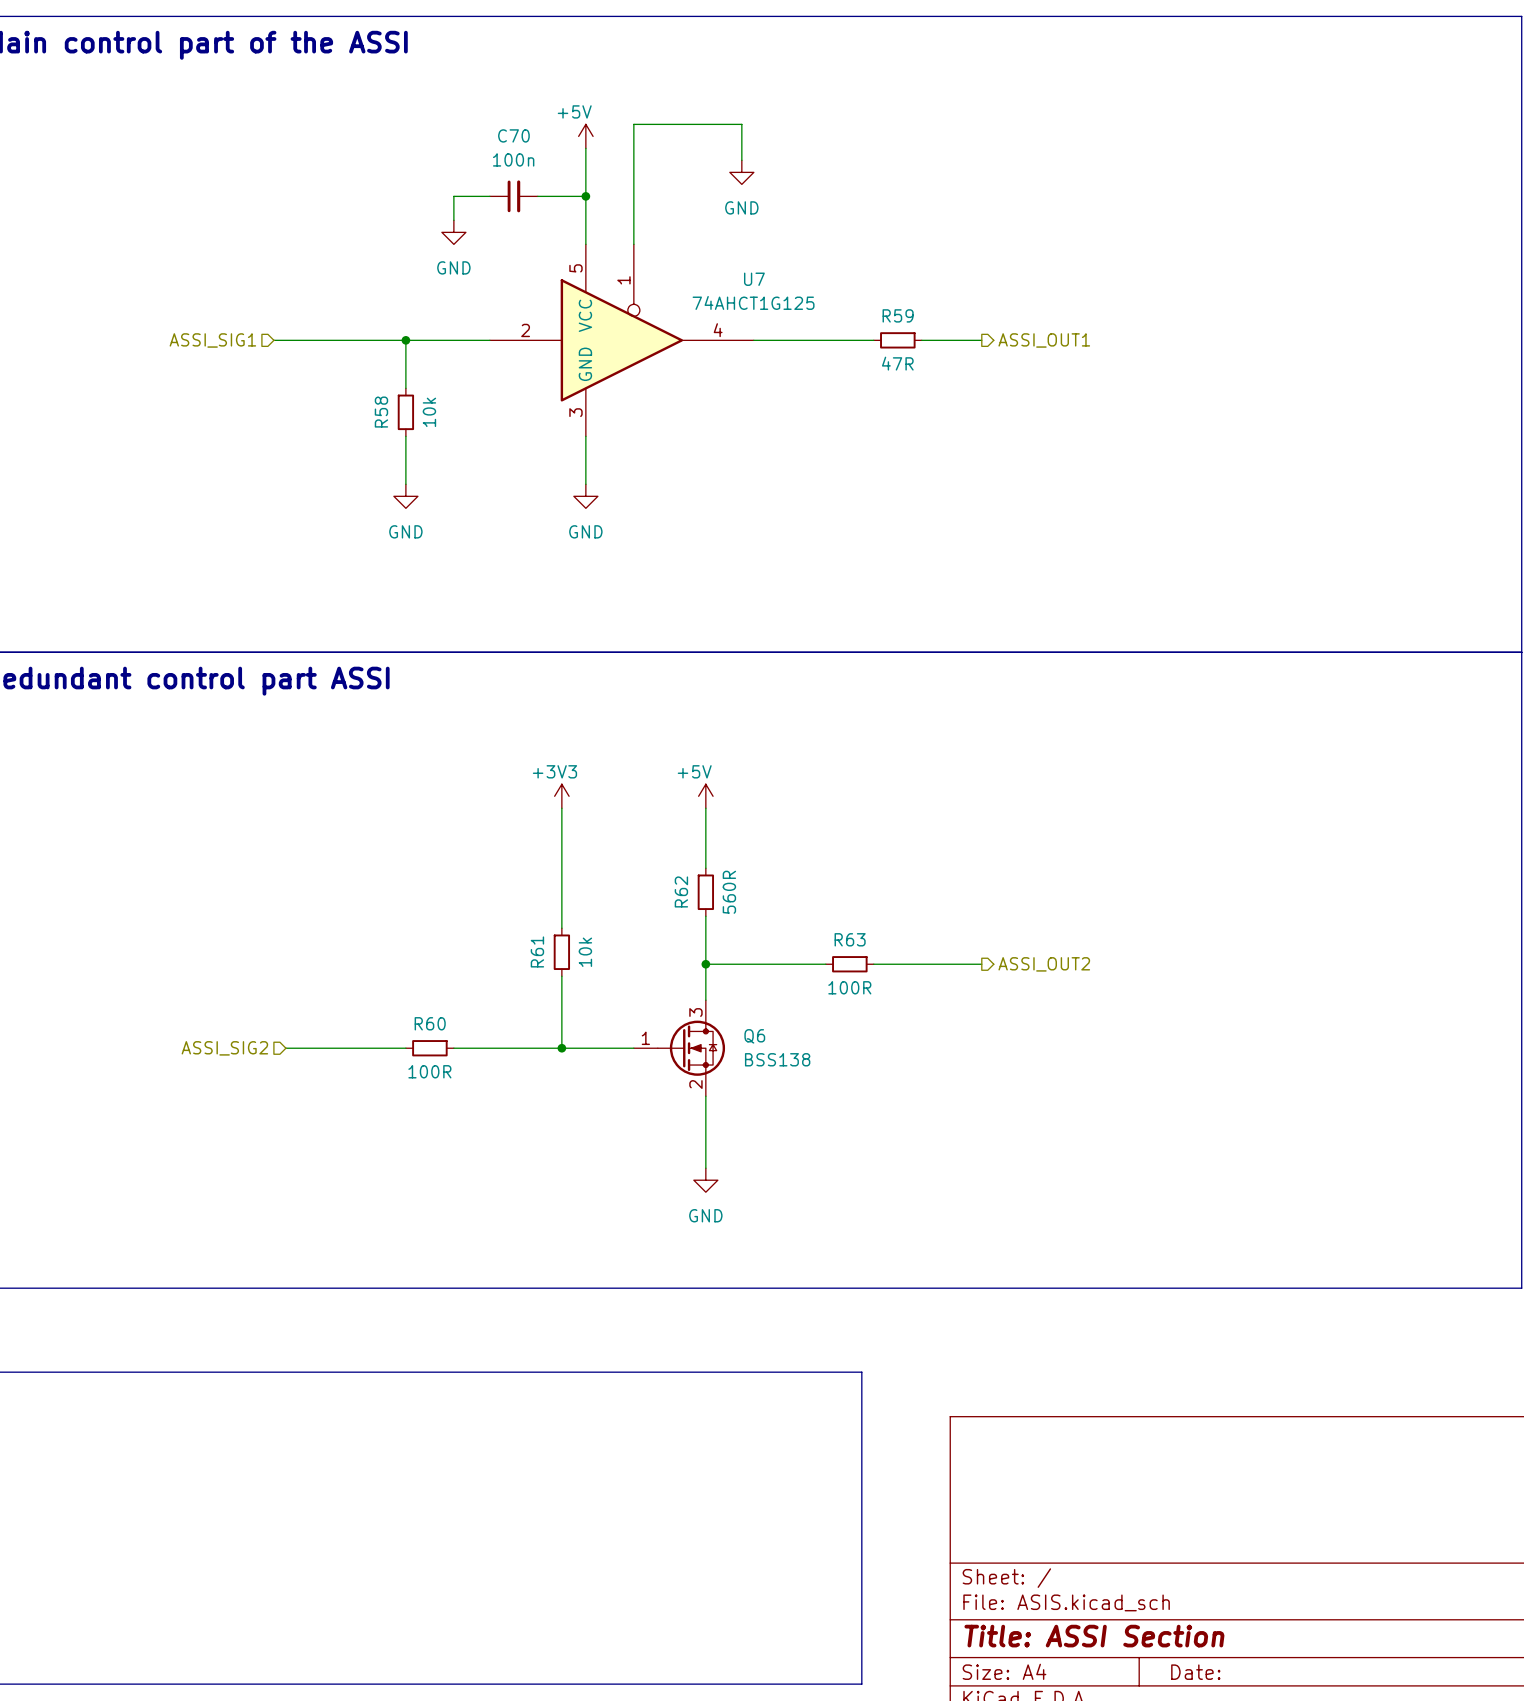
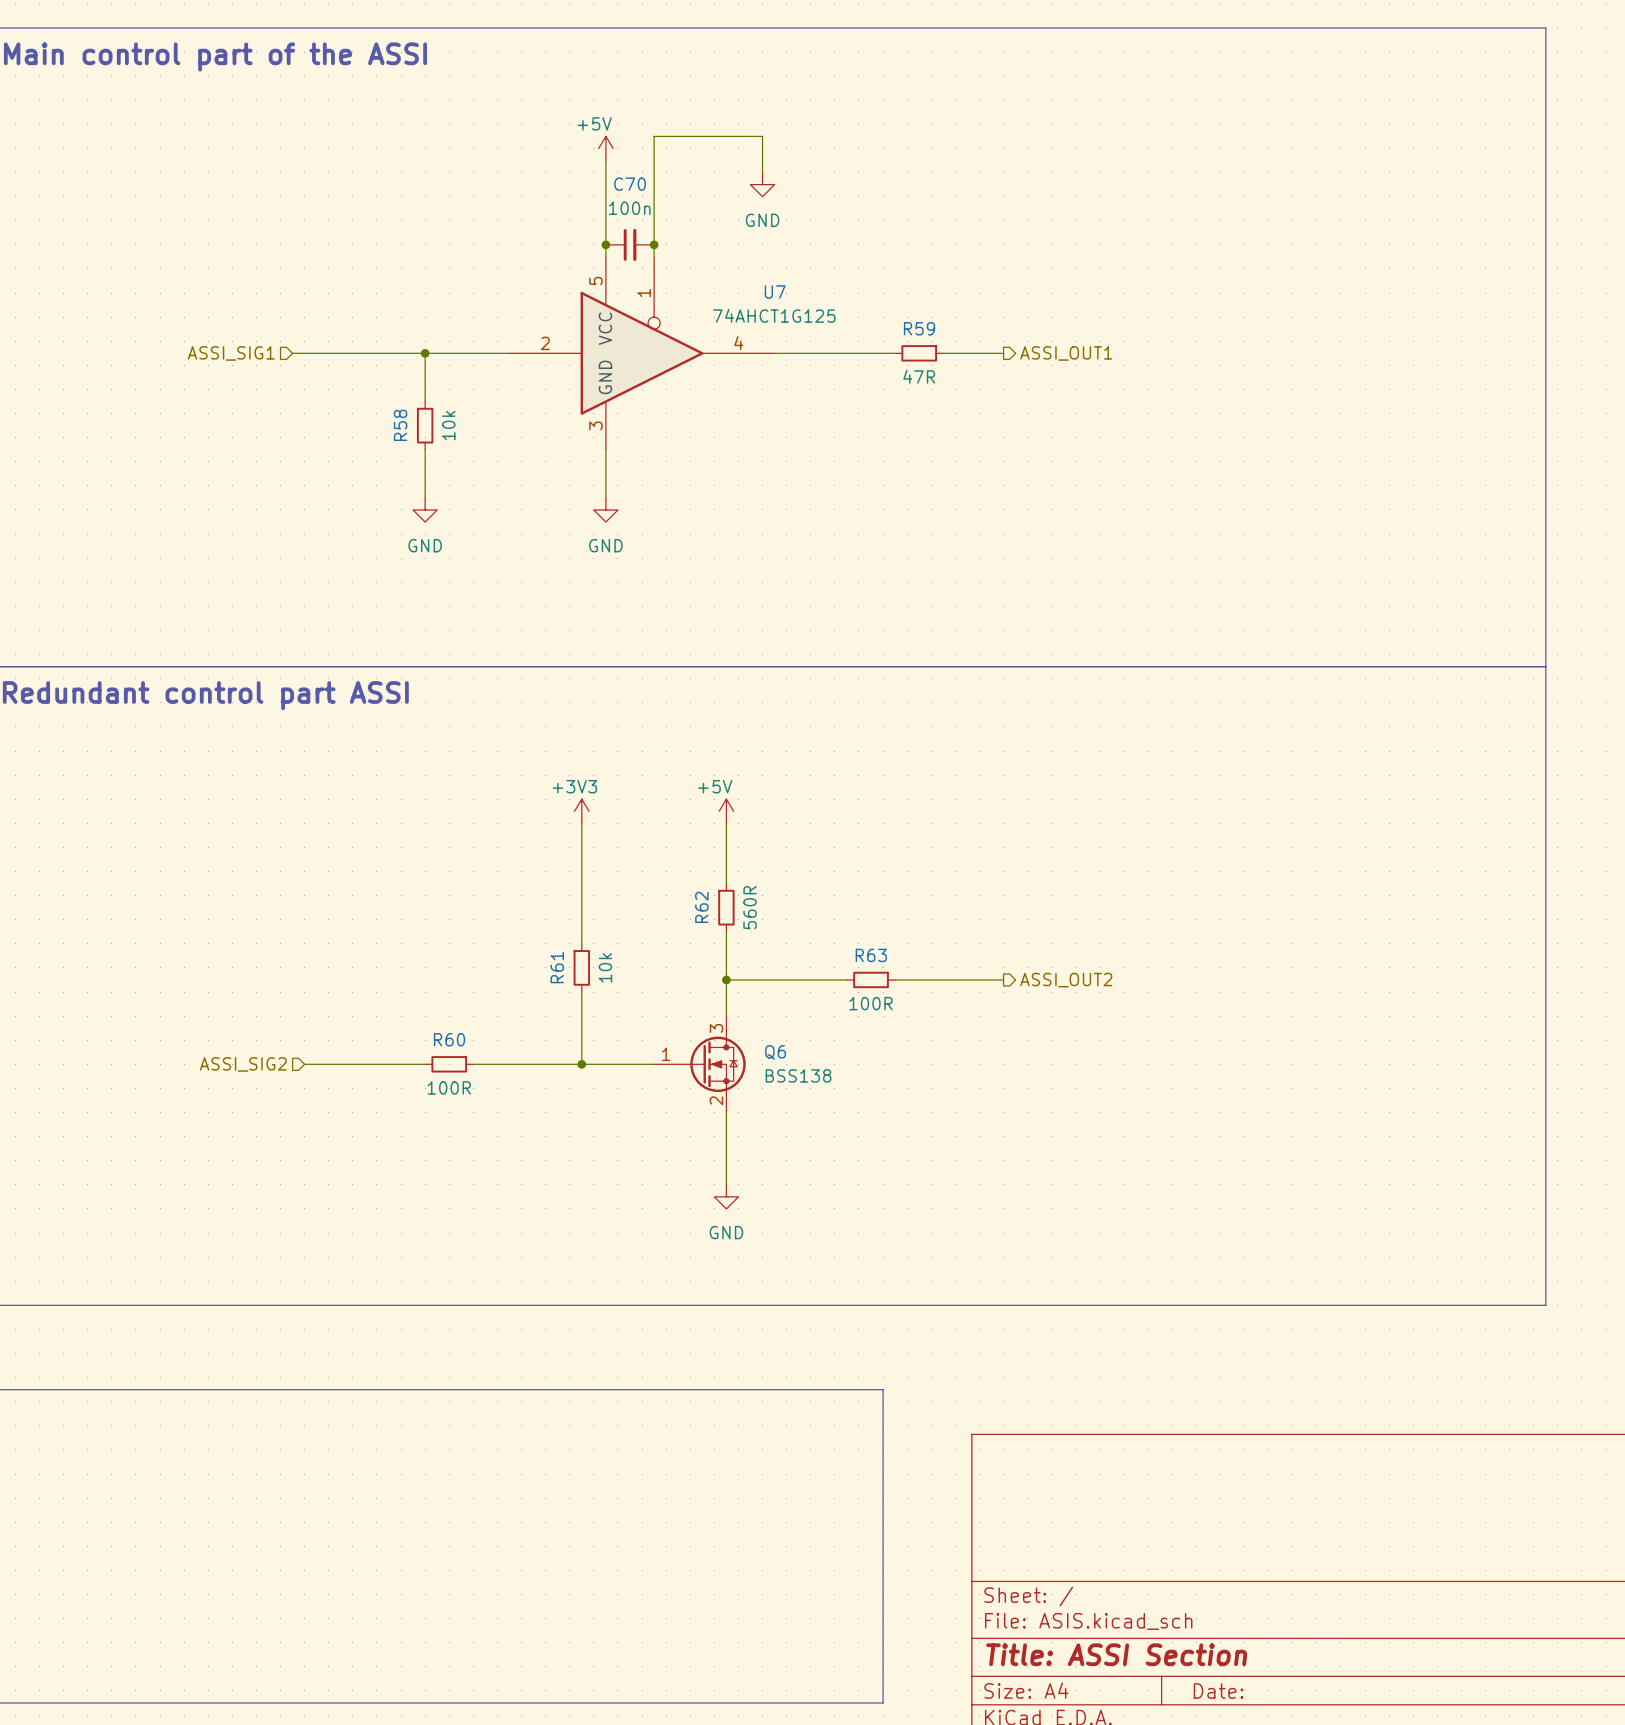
wire: (489, 196) (453, 196) (453, 220) -> none
C70 position: (513, 196) -> (630, 244)
wire: (537, 196) (585, 196) -> none
junction: (585, 196) -> none
power symbol: GND (453, 232) -> none
junction: none -> (605, 244)
junction: none -> (654, 244)

